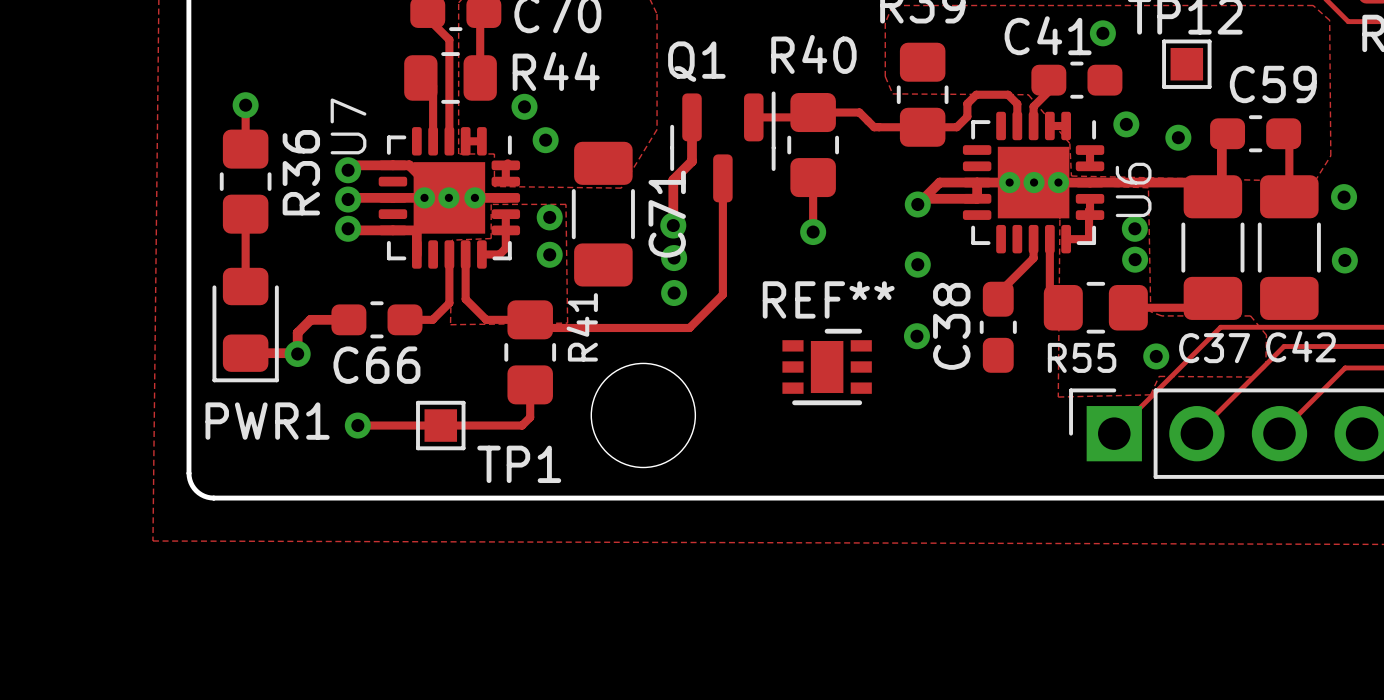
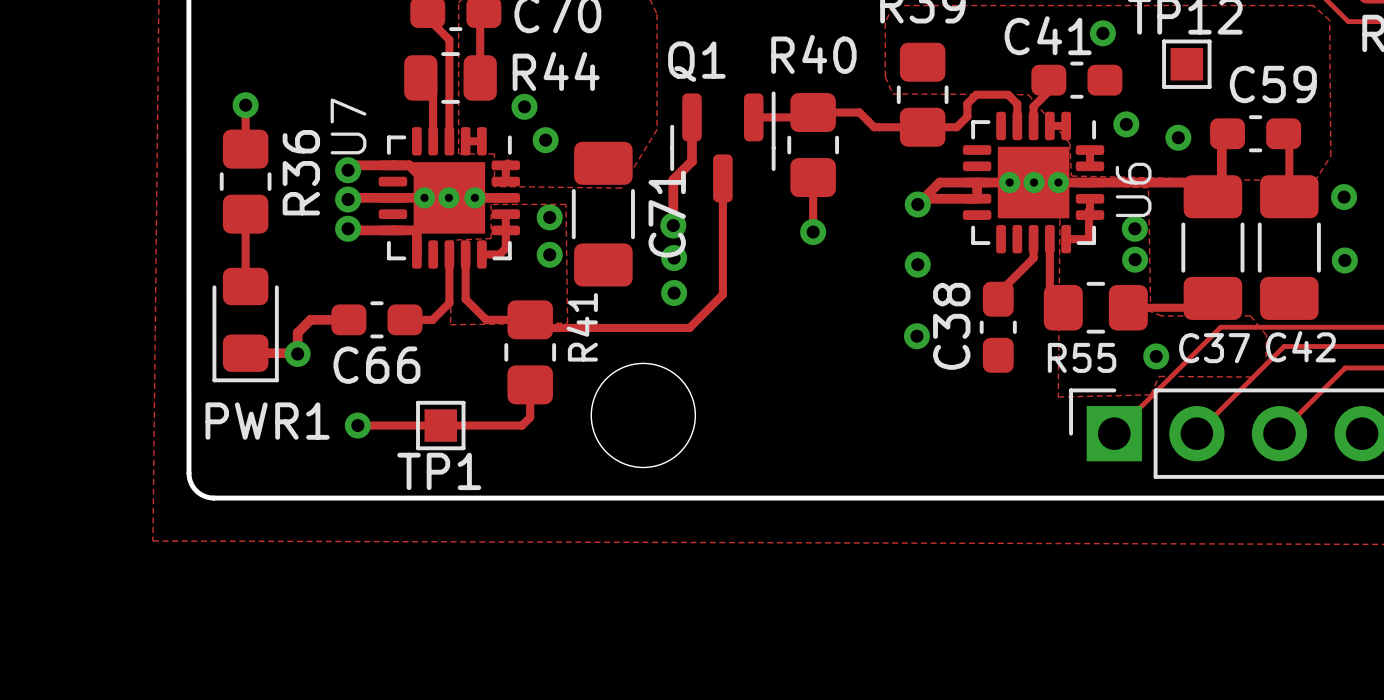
REF**: (827, 367) -> none
TP1 name position: TP1 (519, 464) -> TP1 (439, 471)

